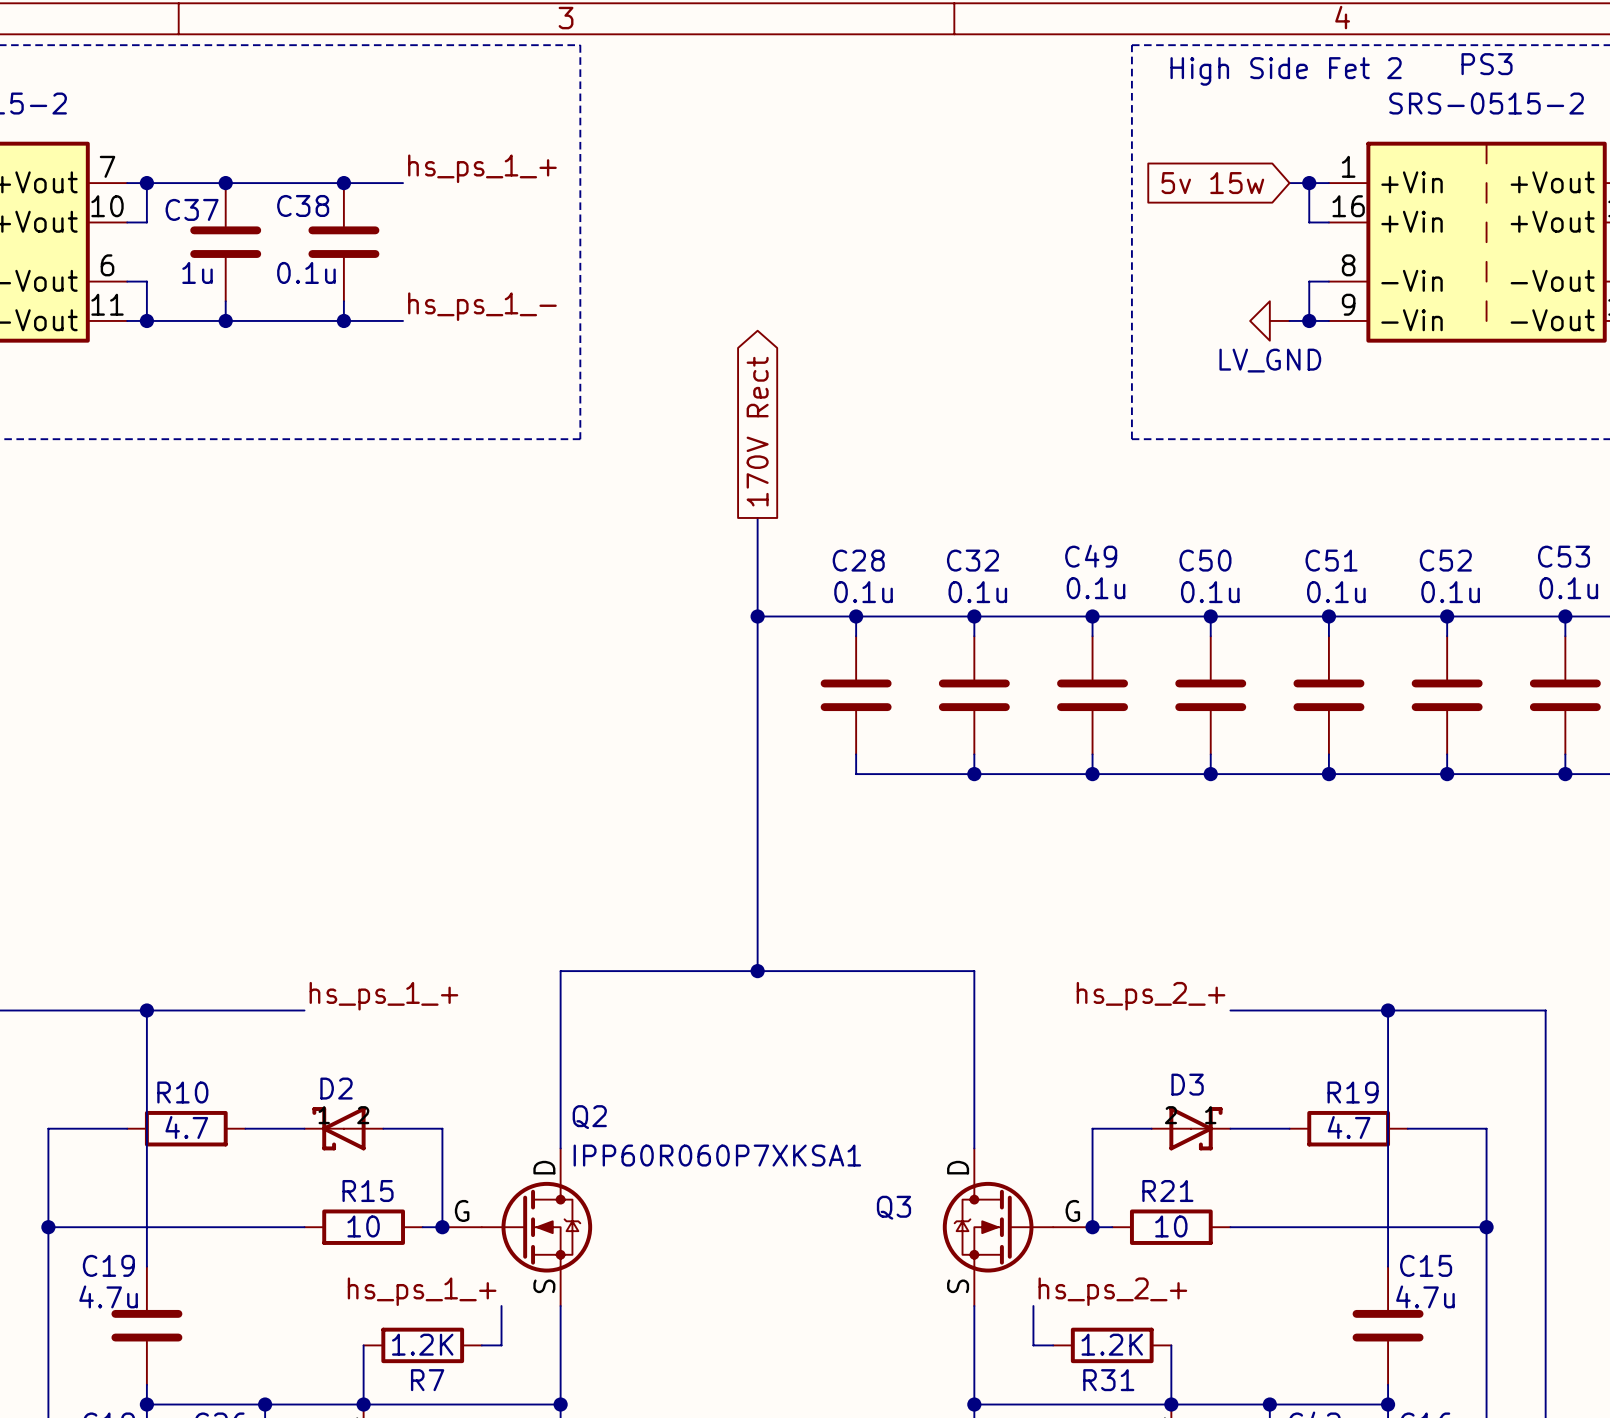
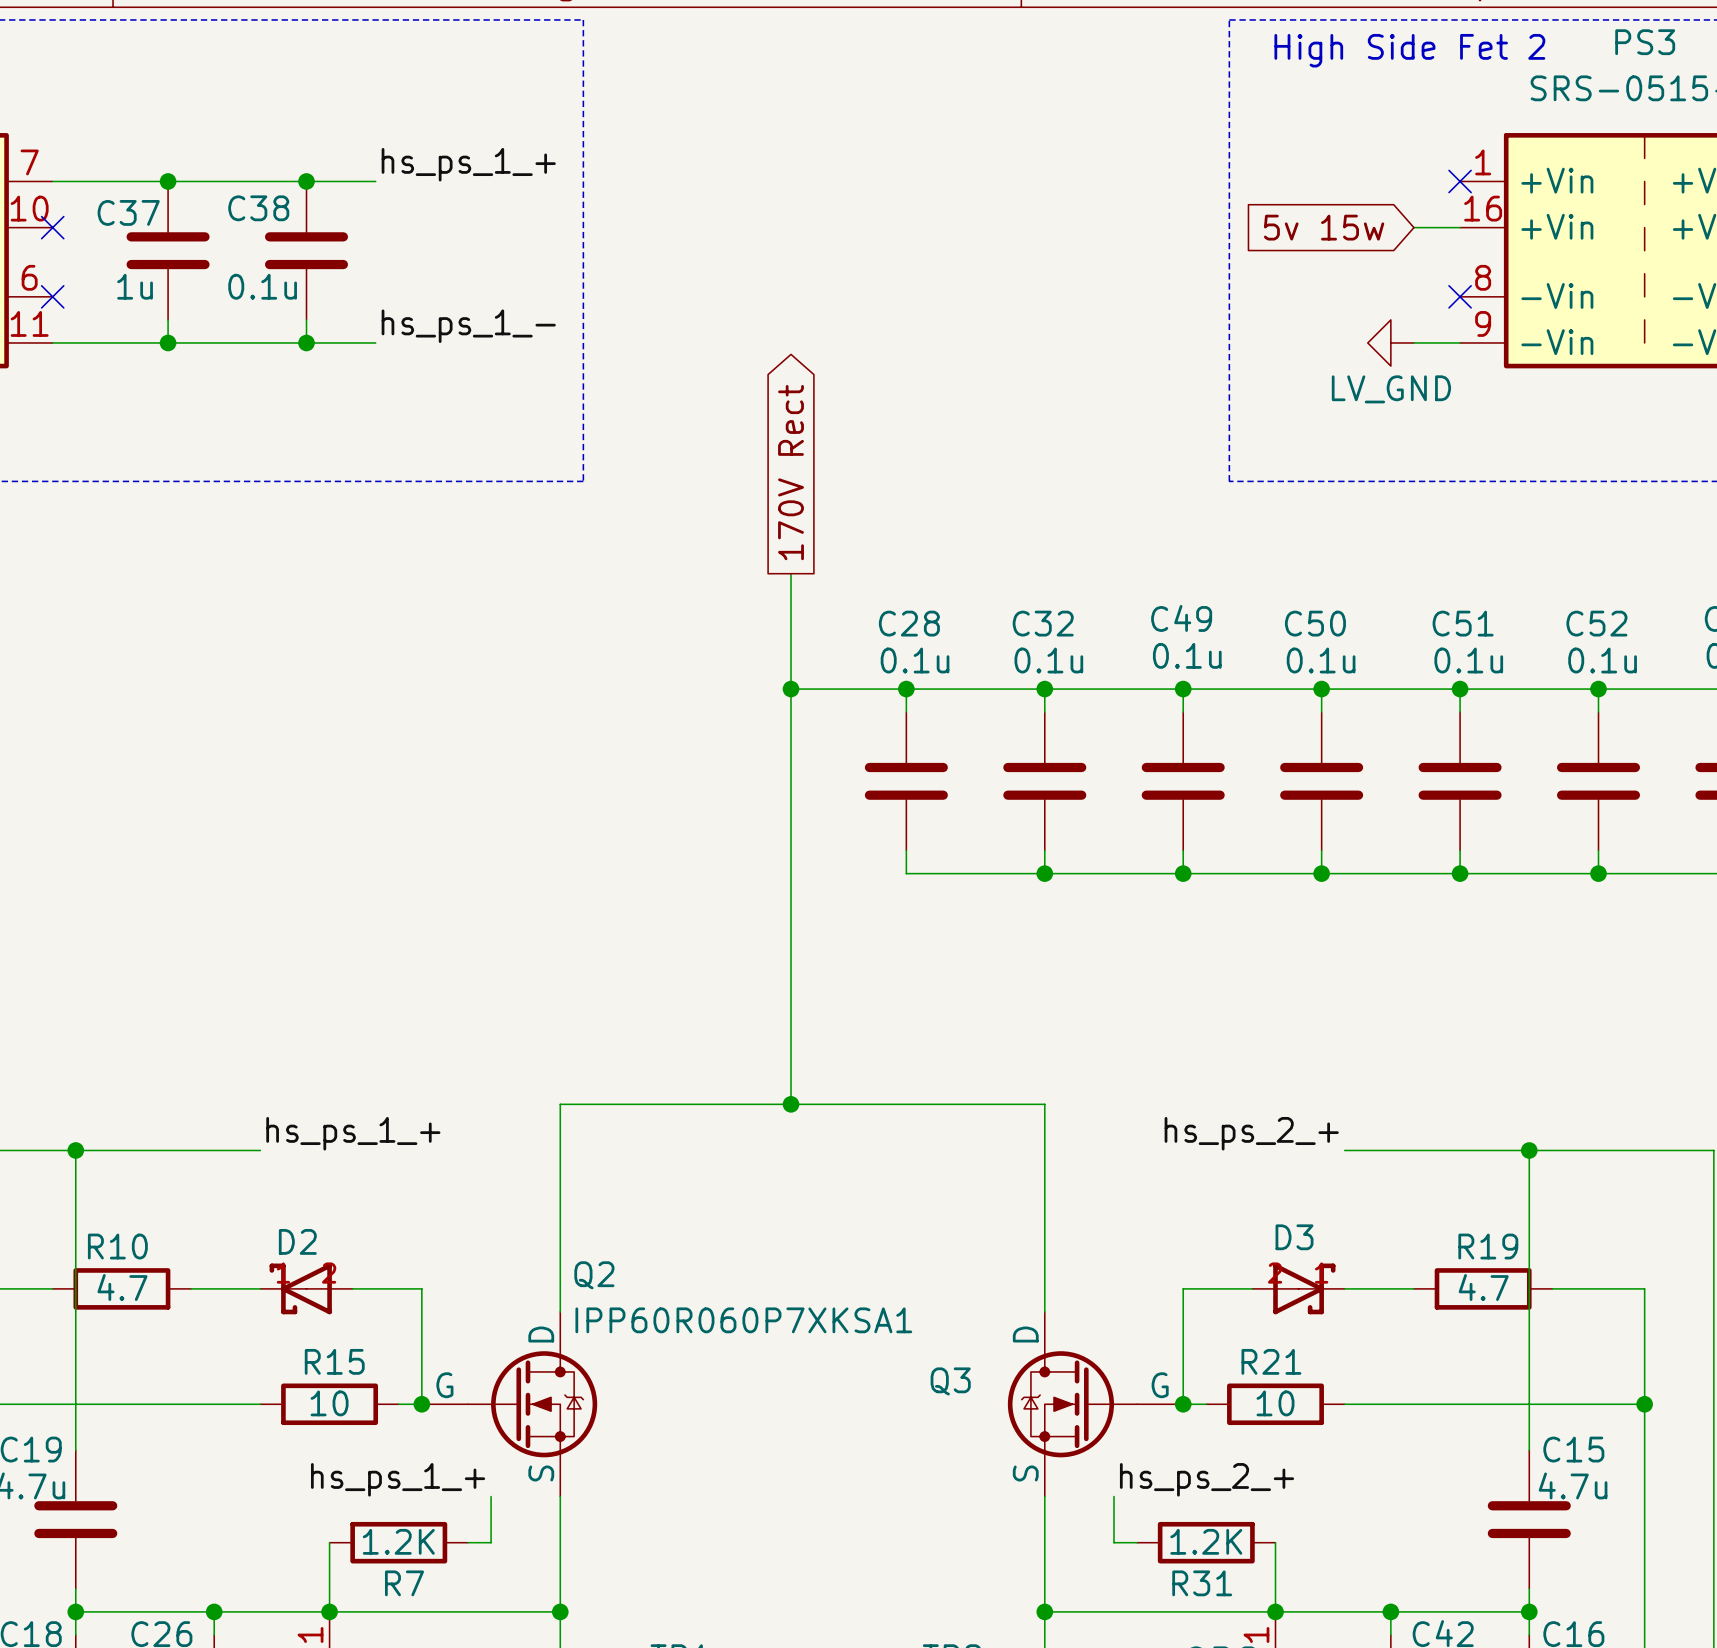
wire: (146, 183) (146, 222) (127, 222) -> none
junction: (146, 183) -> none
global label position: 5v 15w (1212, 183) -> 5v 15w (1324, 227)
wire: (1289, 183) (1328, 183) -> none
wire: (1309, 183) (1309, 222) -> (1413, 227) (1437, 227)
junction: (1309, 183) -> none
no-connect mark: none -> (1460, 181)
no-connect mark: none -> (52, 227)
wire: (127, 281) (146, 281) (146, 320) -> none
no-connect mark: none -> (52, 296)
wire: (1328, 281) (1309, 281) (1309, 320) -> none
no-connect mark: none -> (1460, 296)
junction: (146, 320) -> none
junction: (1309, 320) -> none

